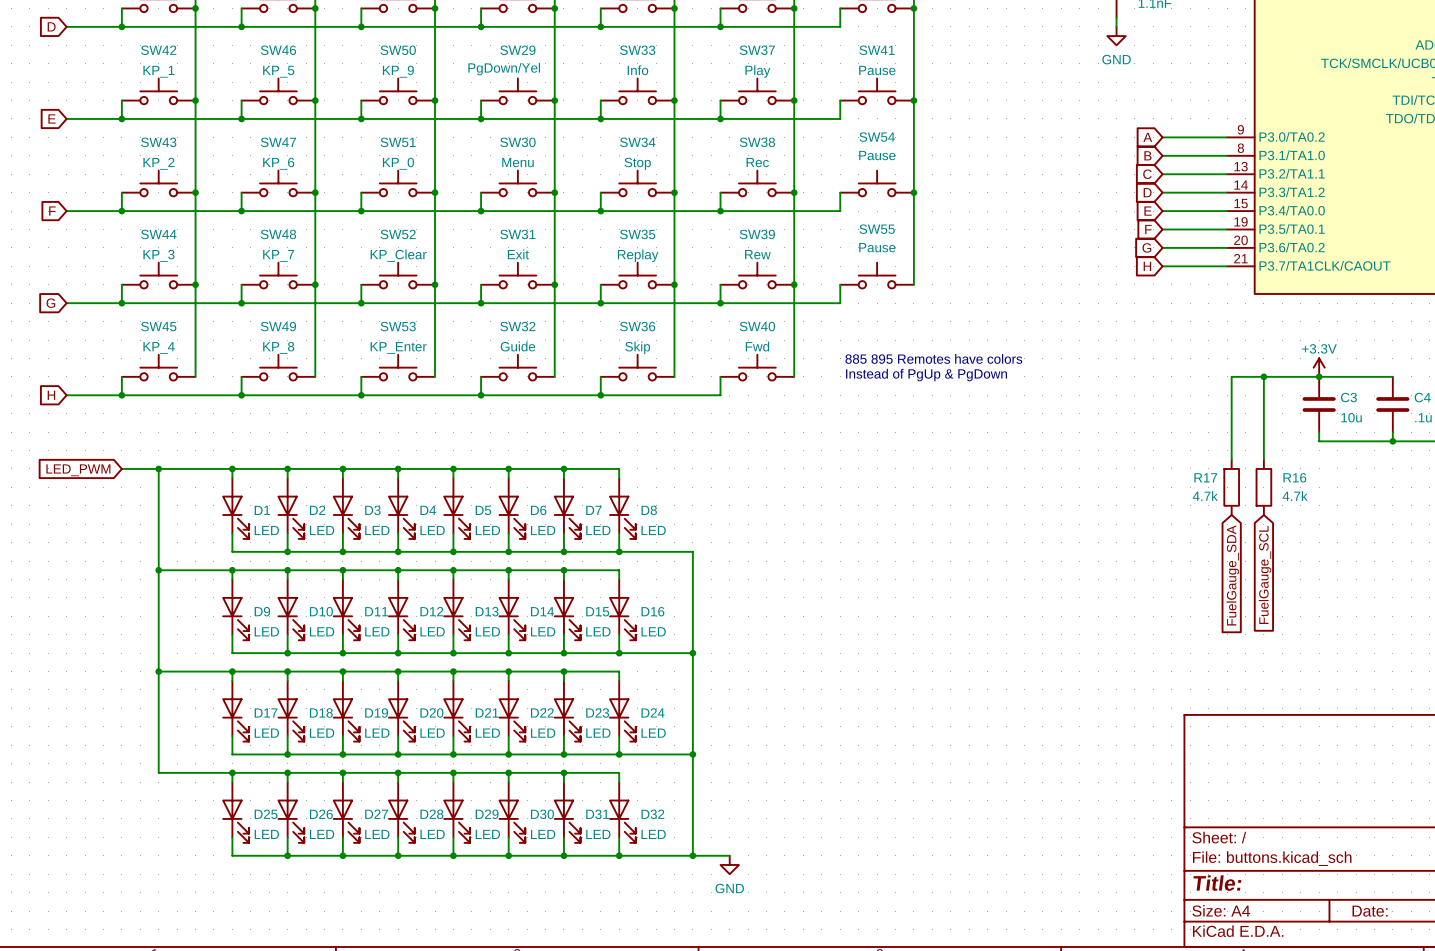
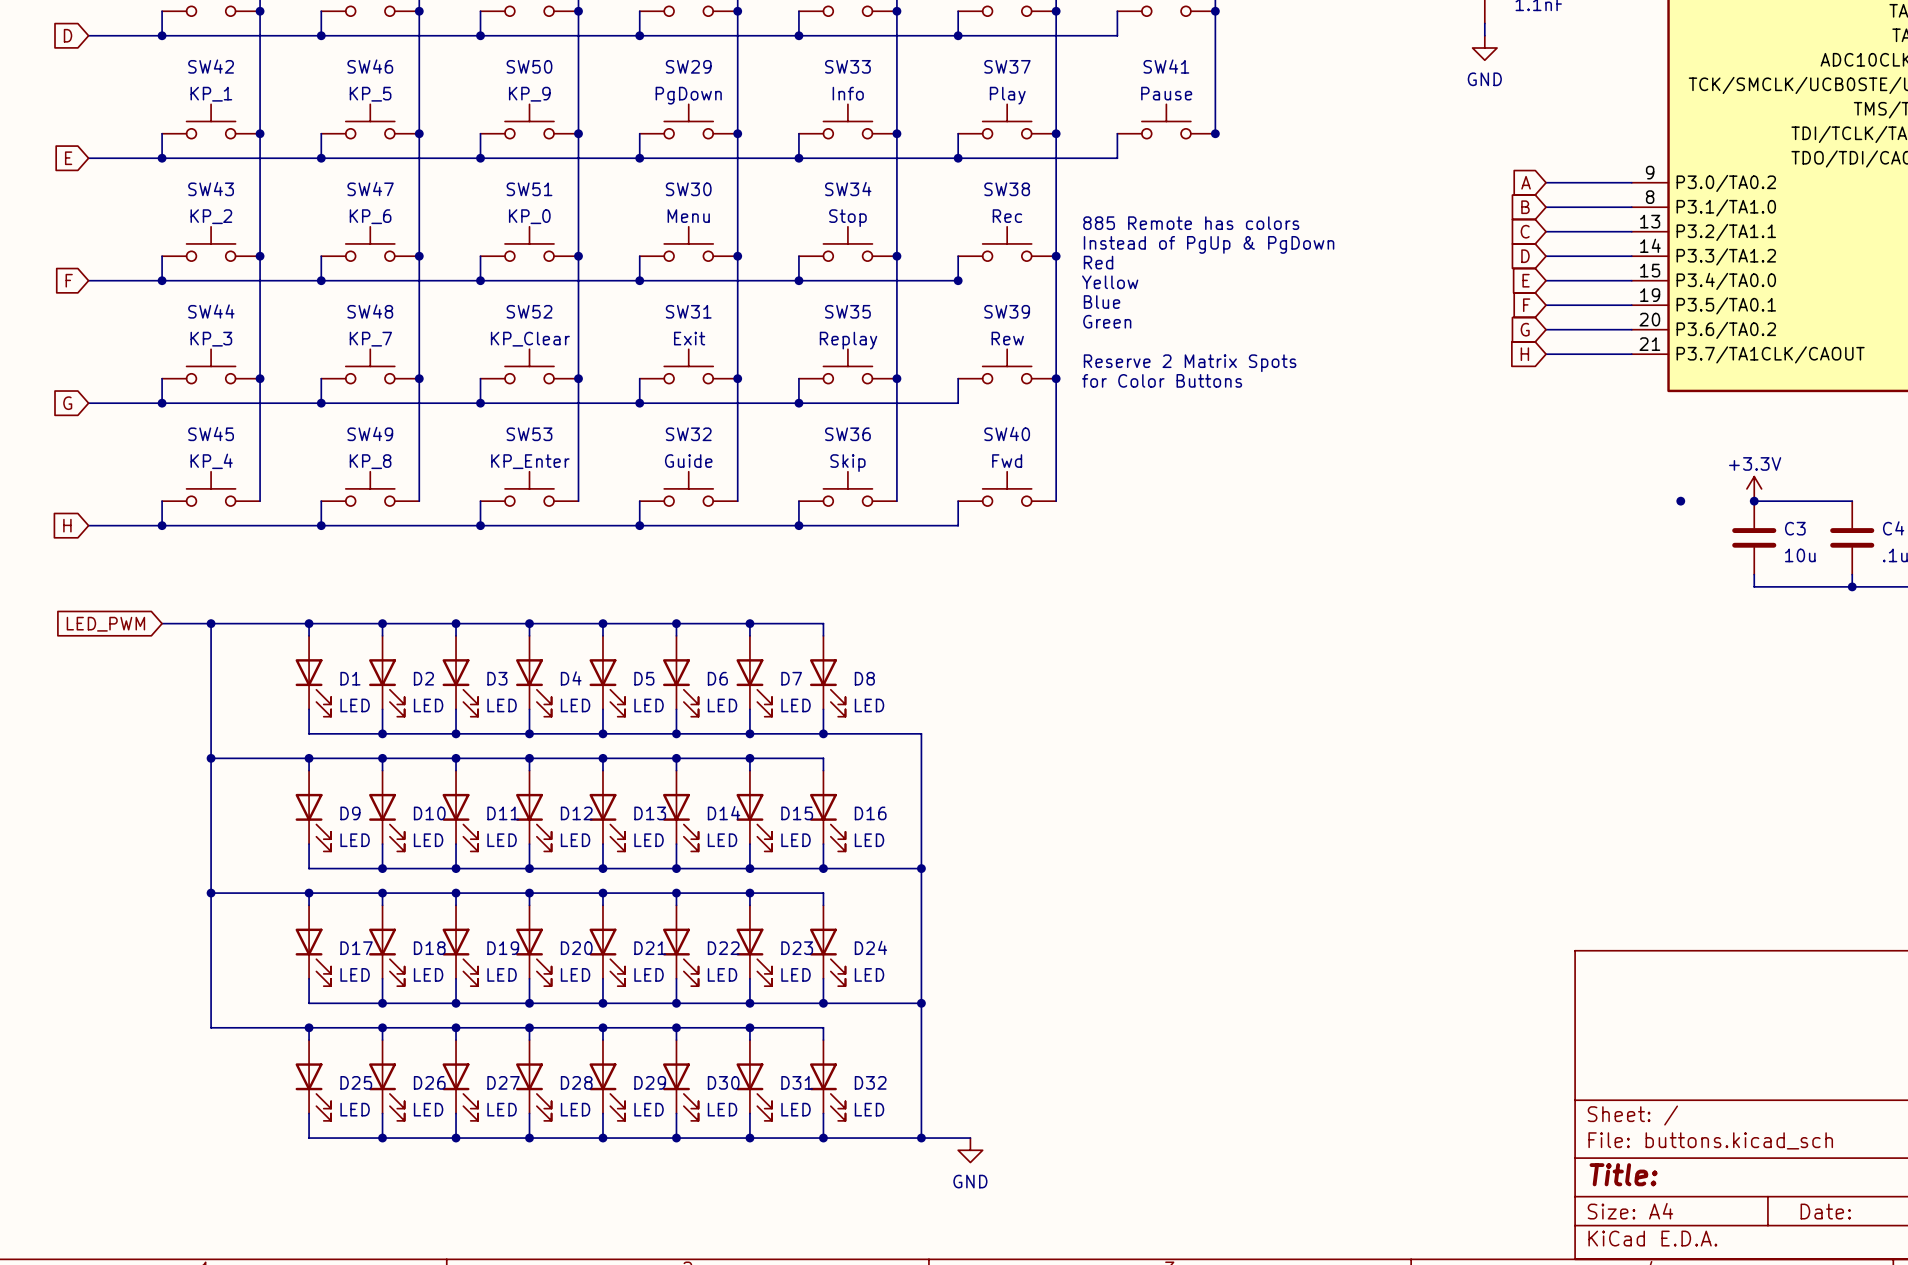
SW29 value: PgDown/Yel (504, 69) -> PgDown (688, 95)
wire: (913, 100) (913, 284) -> none
text: none -> 885 Remote has colors (1191, 223)
SW54: Pause (877, 183) -> none
text: none -> Instead of PgUp & PgDown (1209, 244)
wire: (840, 192) (840, 211) (720, 211) -> none
junction: (913, 192) -> none
text: none -> Red (1098, 262)
text: none -> Yellow (1110, 282)
text: none -> Blue (1102, 302)
text: none -> Green (1107, 321)
text: none -> Reserve 2 Matrix Spots (1190, 363)
SW55: Pause (877, 275) -> none
wire: (840, 284) (840, 303) (720, 303) -> none
text: none -> for Color Buttons (1162, 380)
junction: (720, 303) -> none
text: 885 895 Remotes have colors (933, 358) -> none
text: Instead of PgUp & PgDown (926, 375) -> none
wire: (1263, 376) (1263, 459) -> none
wire: (1319, 376) (1231, 376) (1231, 459) -> none
R17: 4.7k (1231, 487) -> none
R16: 4.7k (1263, 487) -> none
global label: FuelGauge_SCL (1265, 574) -> none
global label: FuelGauge_SDA (1232, 575) -> none

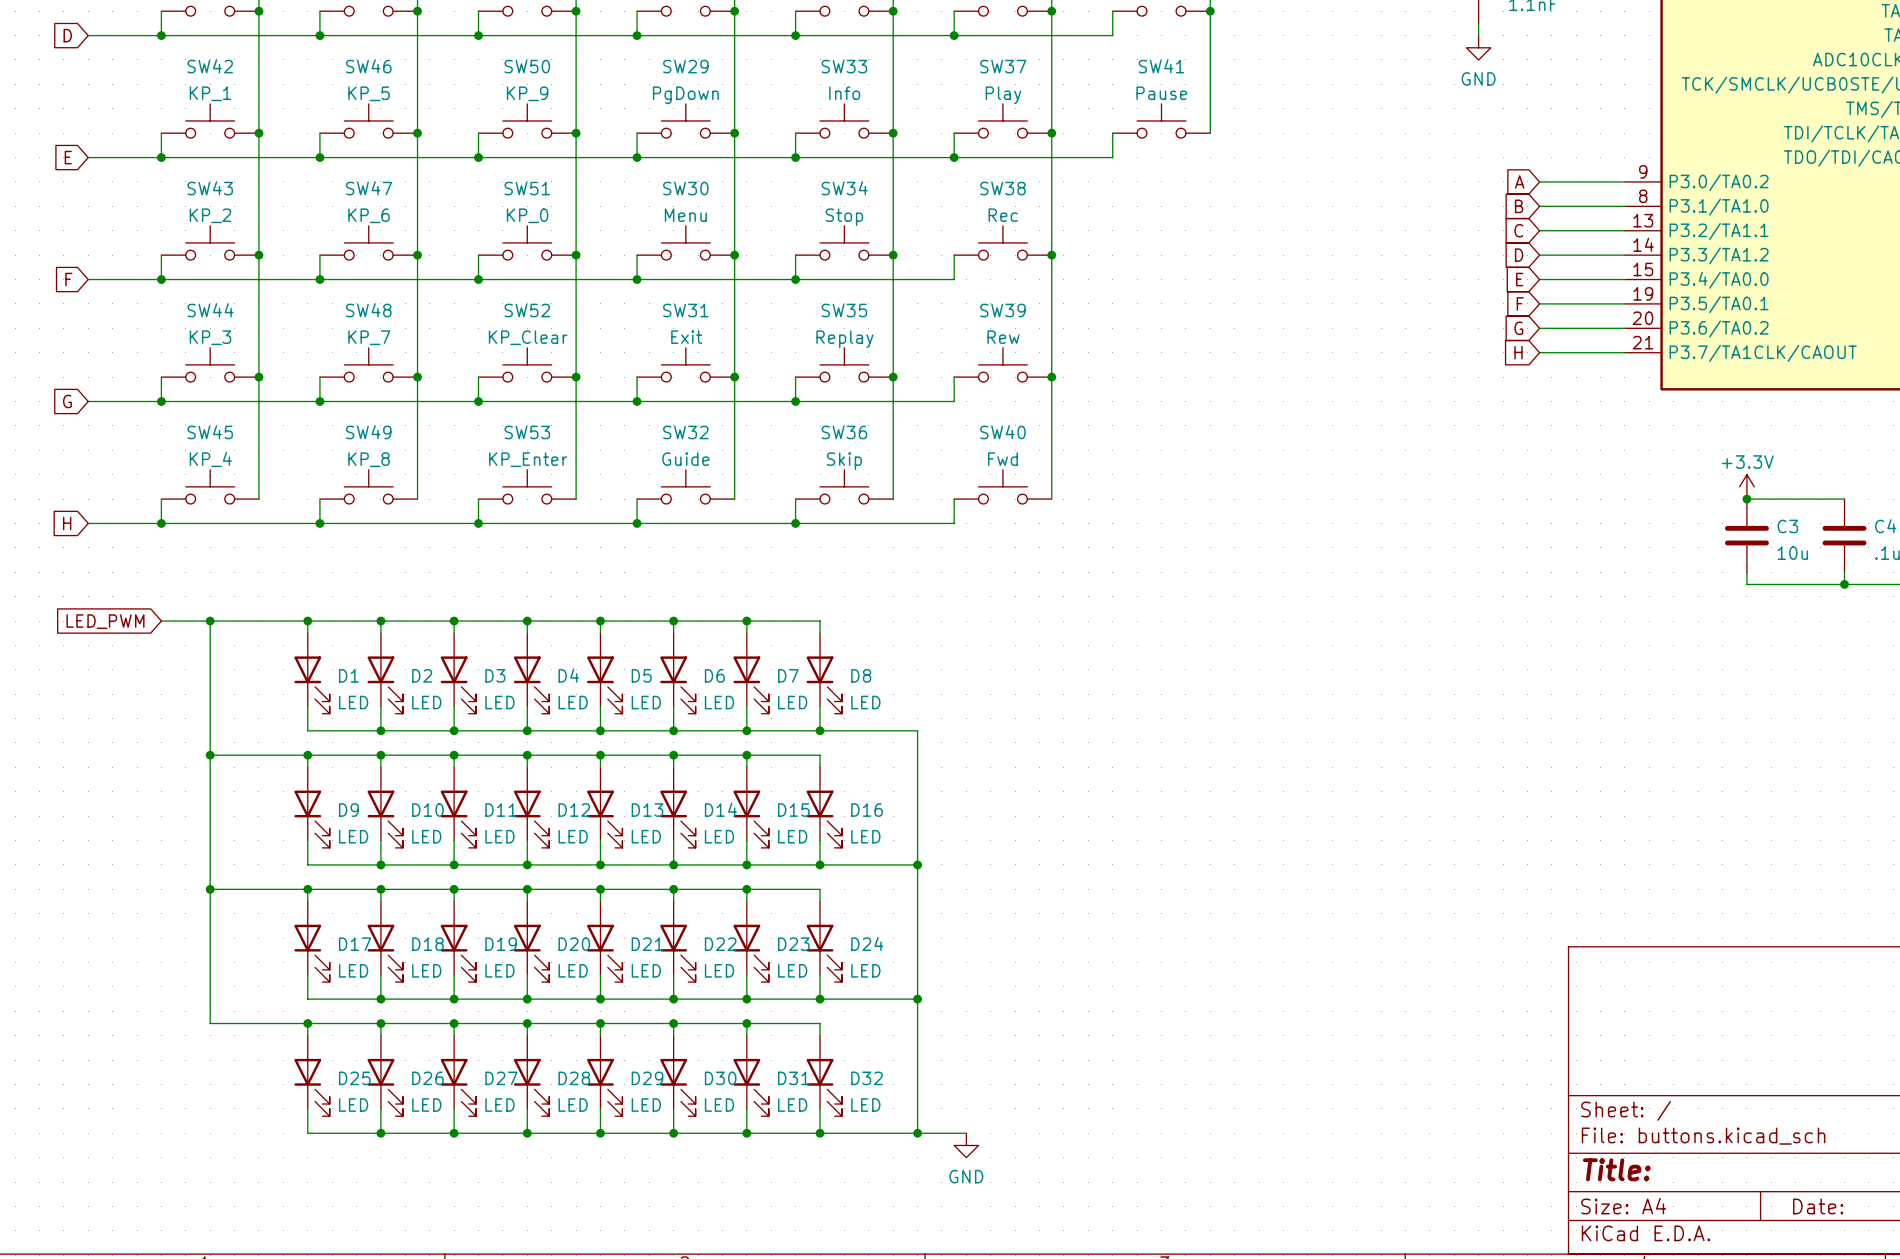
junction: (1215, 133) -> none
text: 885 Remote has colors (1191, 223) -> none
text: Instead of PgUp & PgDown (1209, 244) -> none
text: Red (1098, 262) -> none
junction: (958, 280) -> none
text: Yellow (1110, 282) -> none
text: Blue (1102, 302) -> none
text: Green (1107, 321) -> none
text: Reserve 2 Matrix Spots (1190, 363) -> none
text: for Color Buttons (1162, 380) -> none
junction: (1680, 501) -> none

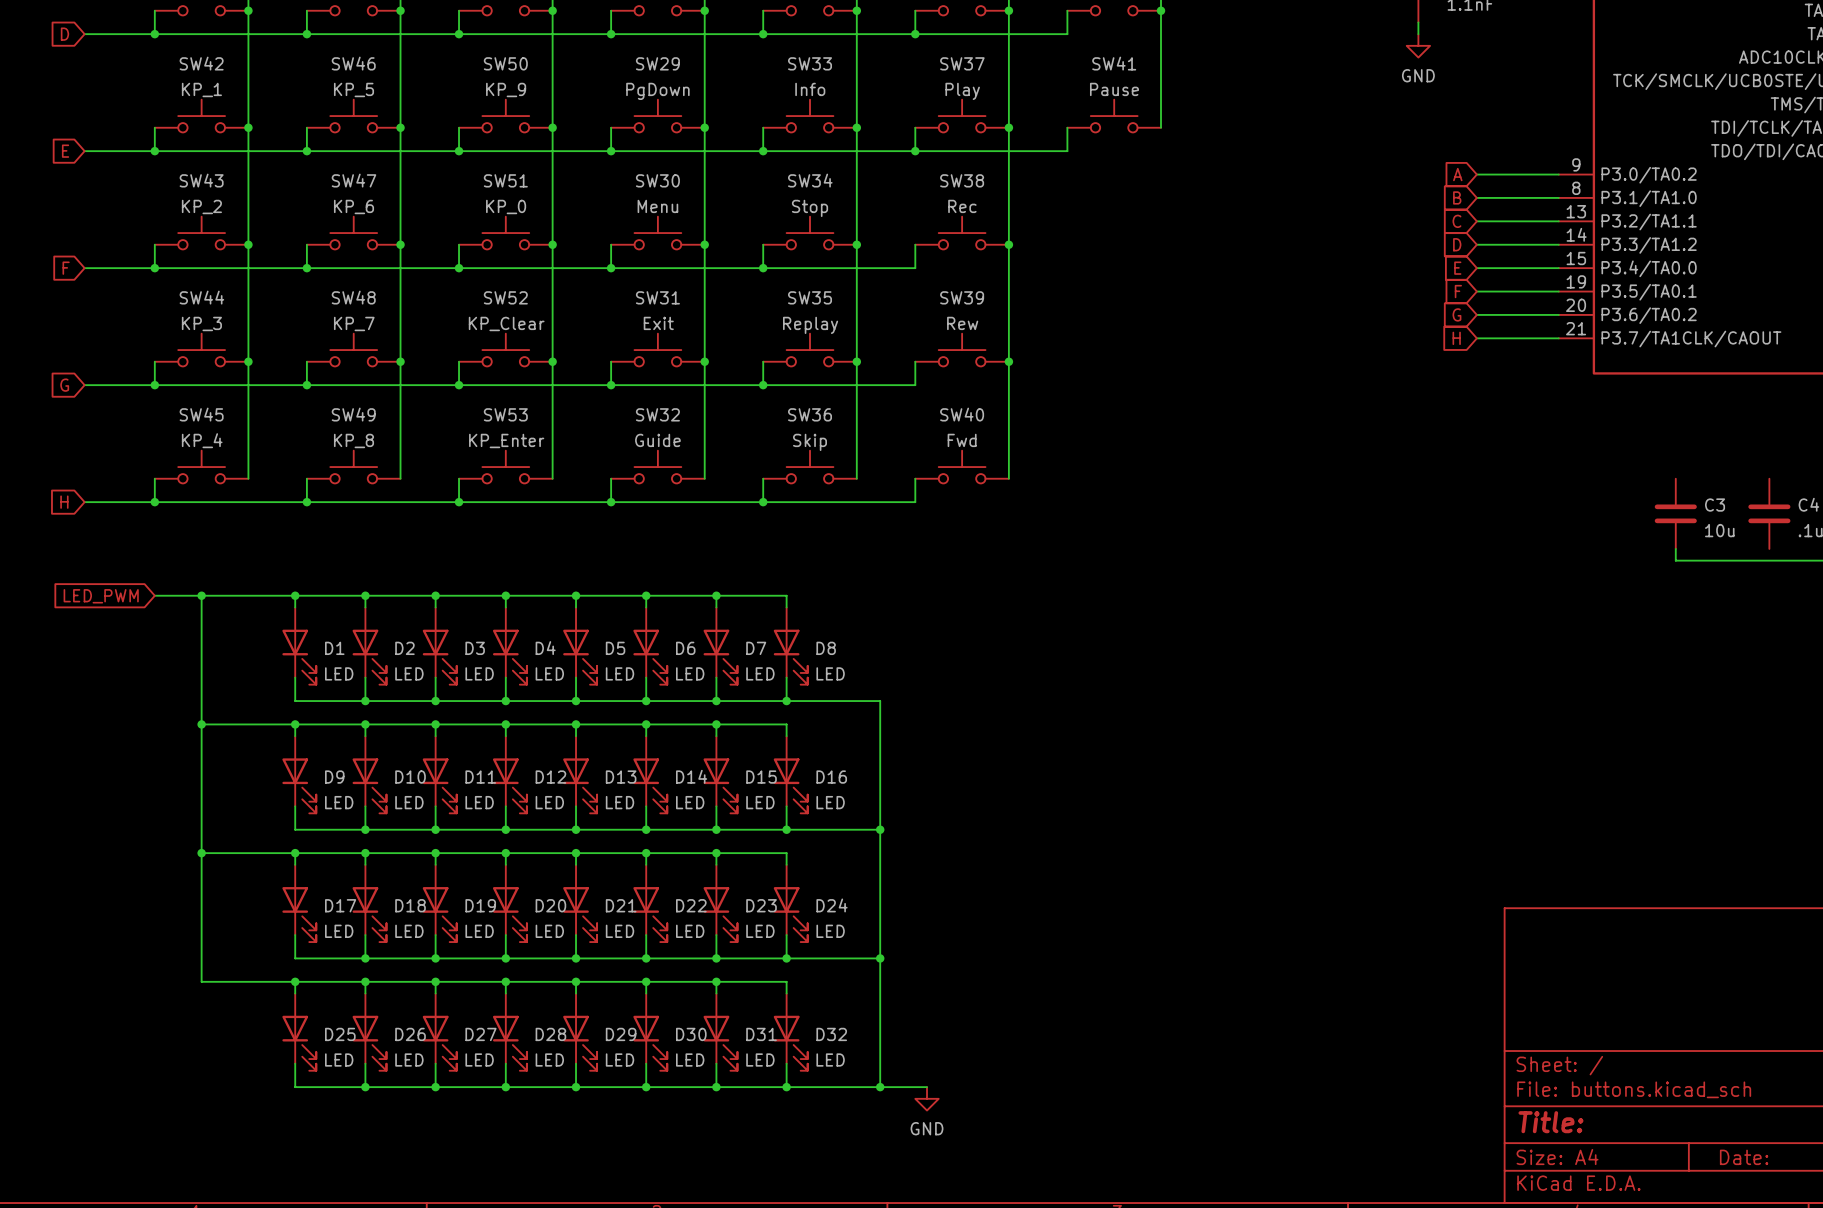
power symbol: +3.3V (1746, 486) -> none
wire: (1746, 499) (1844, 499) -> none
junction: (1746, 499) -> none
wire: (1844, 572) (1844, 584) -> none
junction: (1844, 584) -> none

